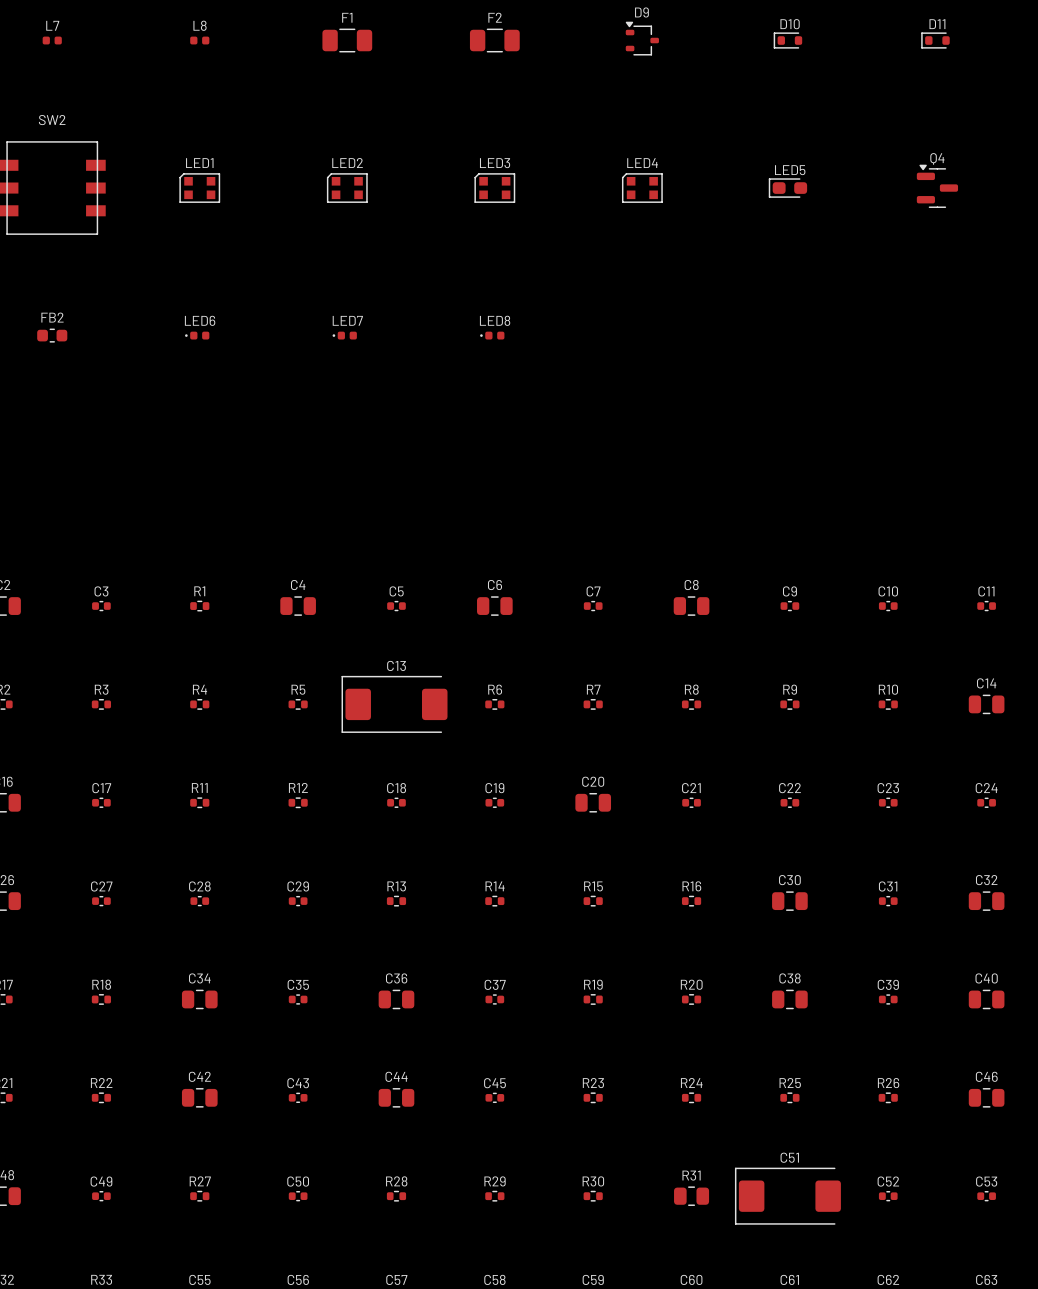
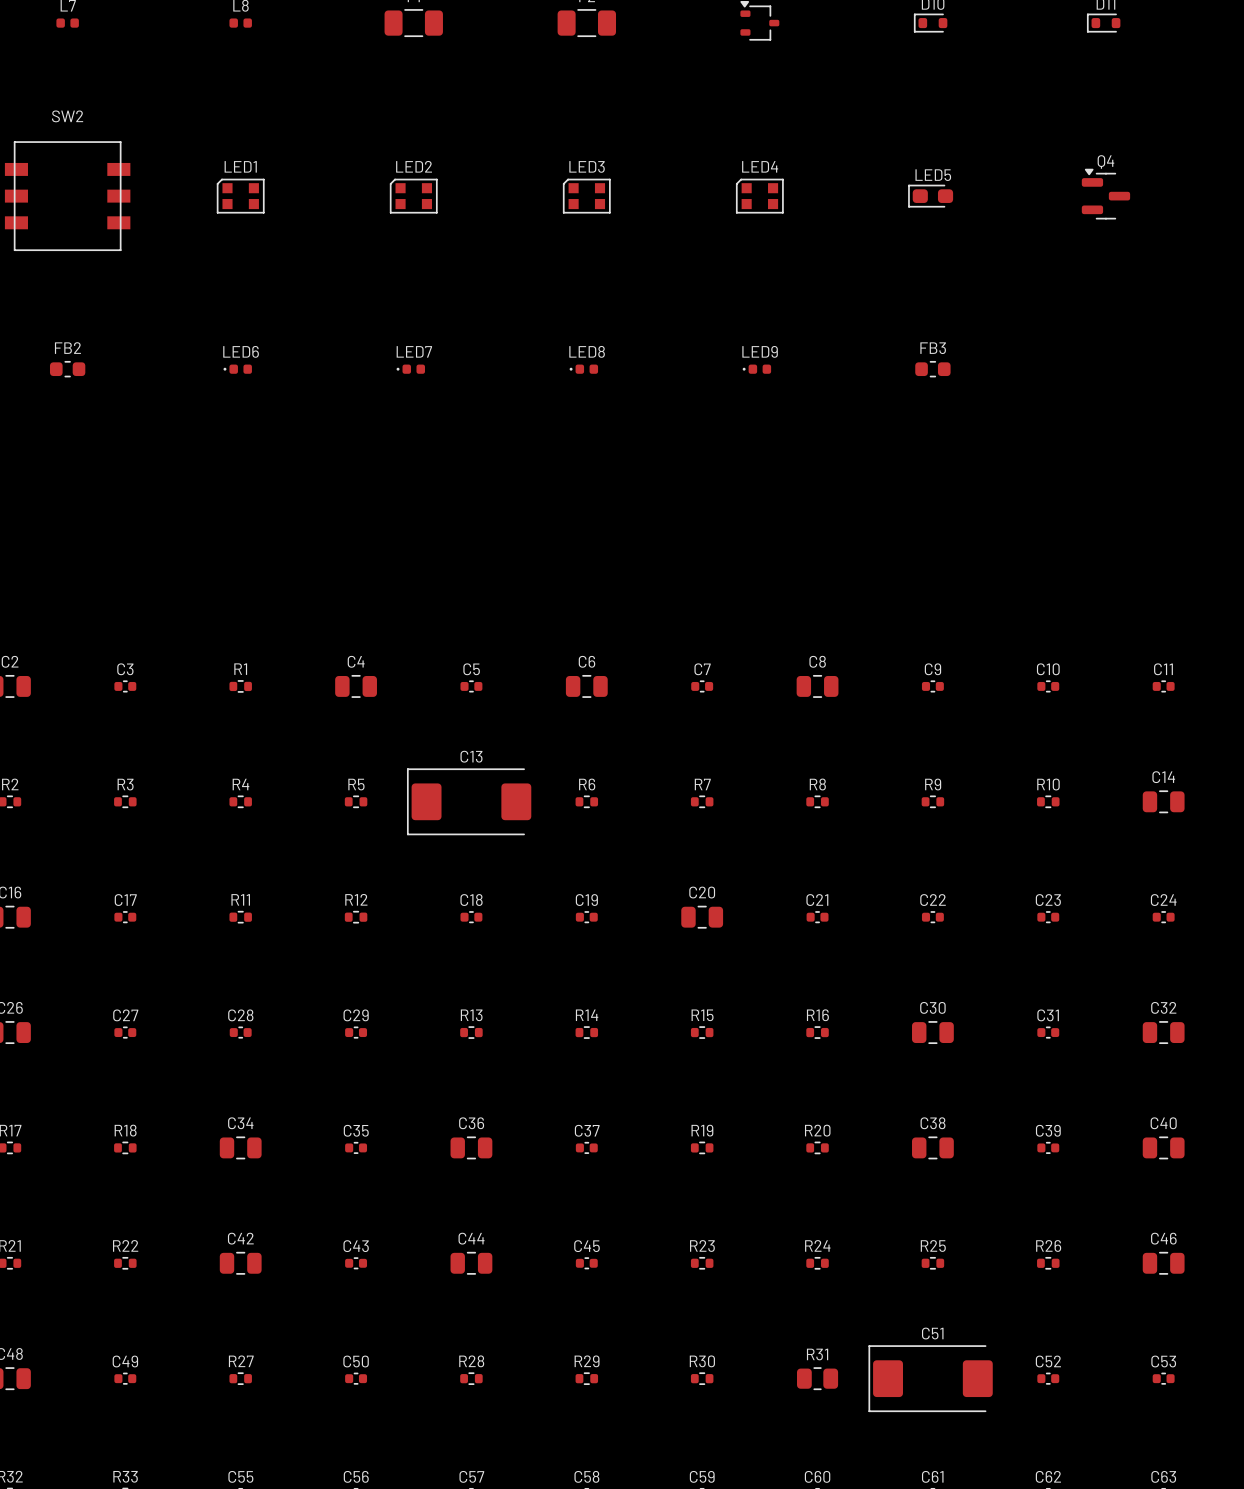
LED9: none -> (756, 369)
FB3: none -> (932, 369)

